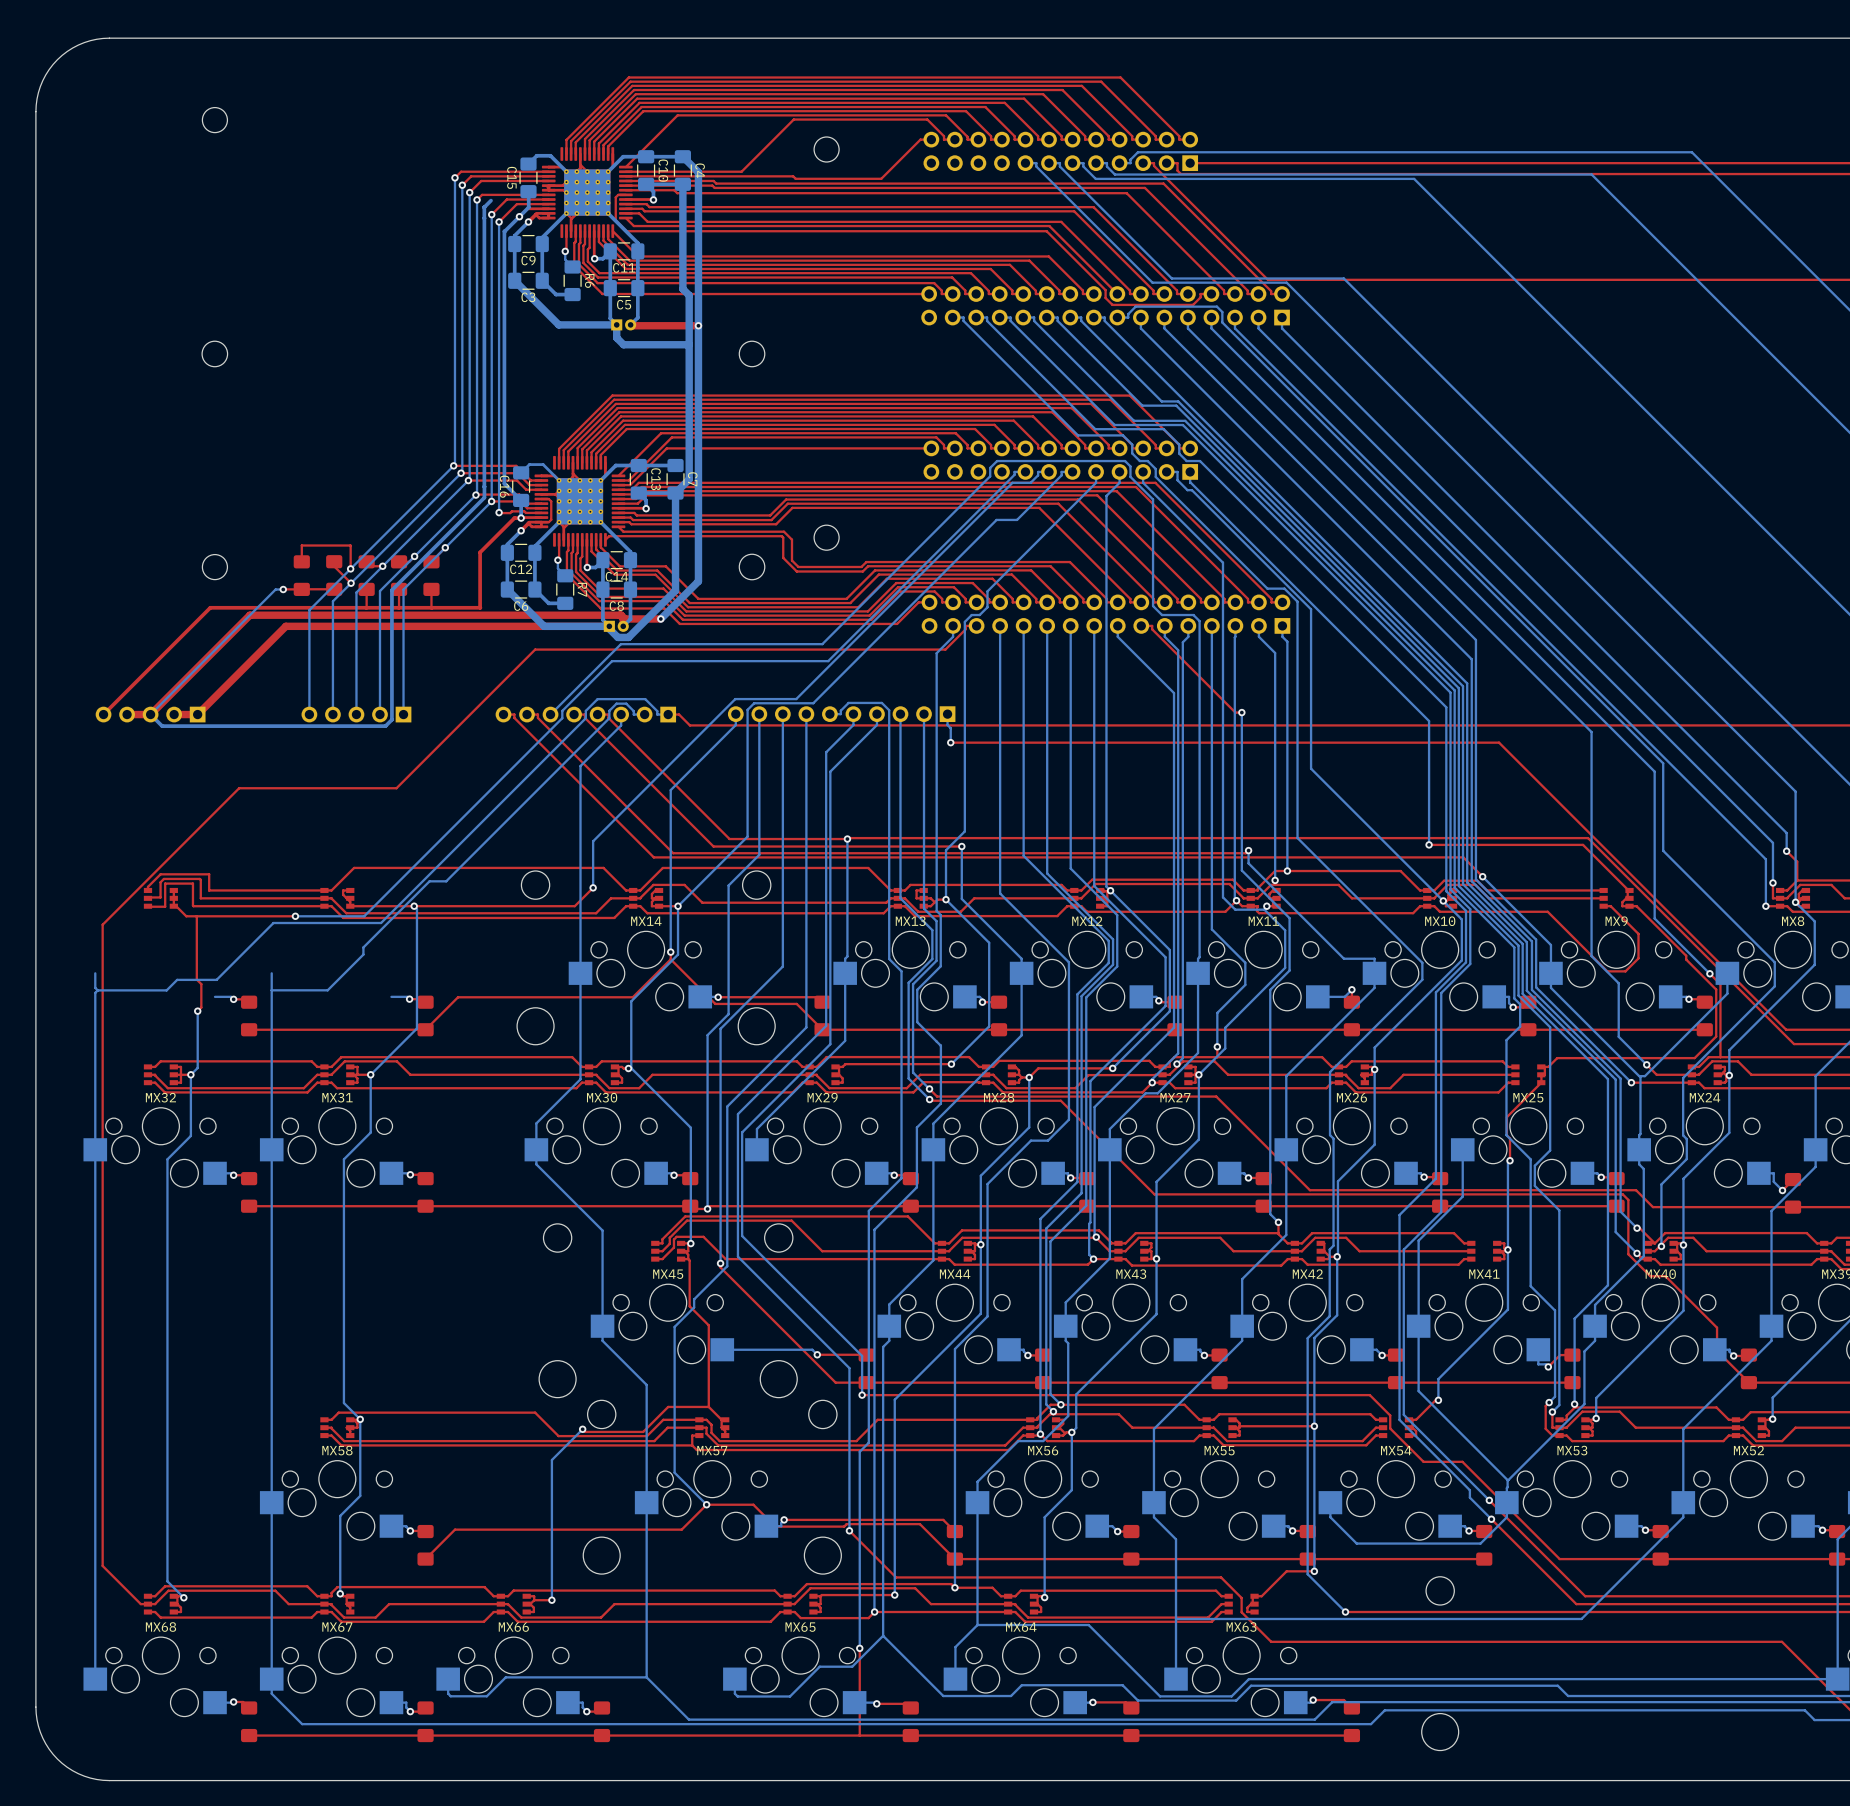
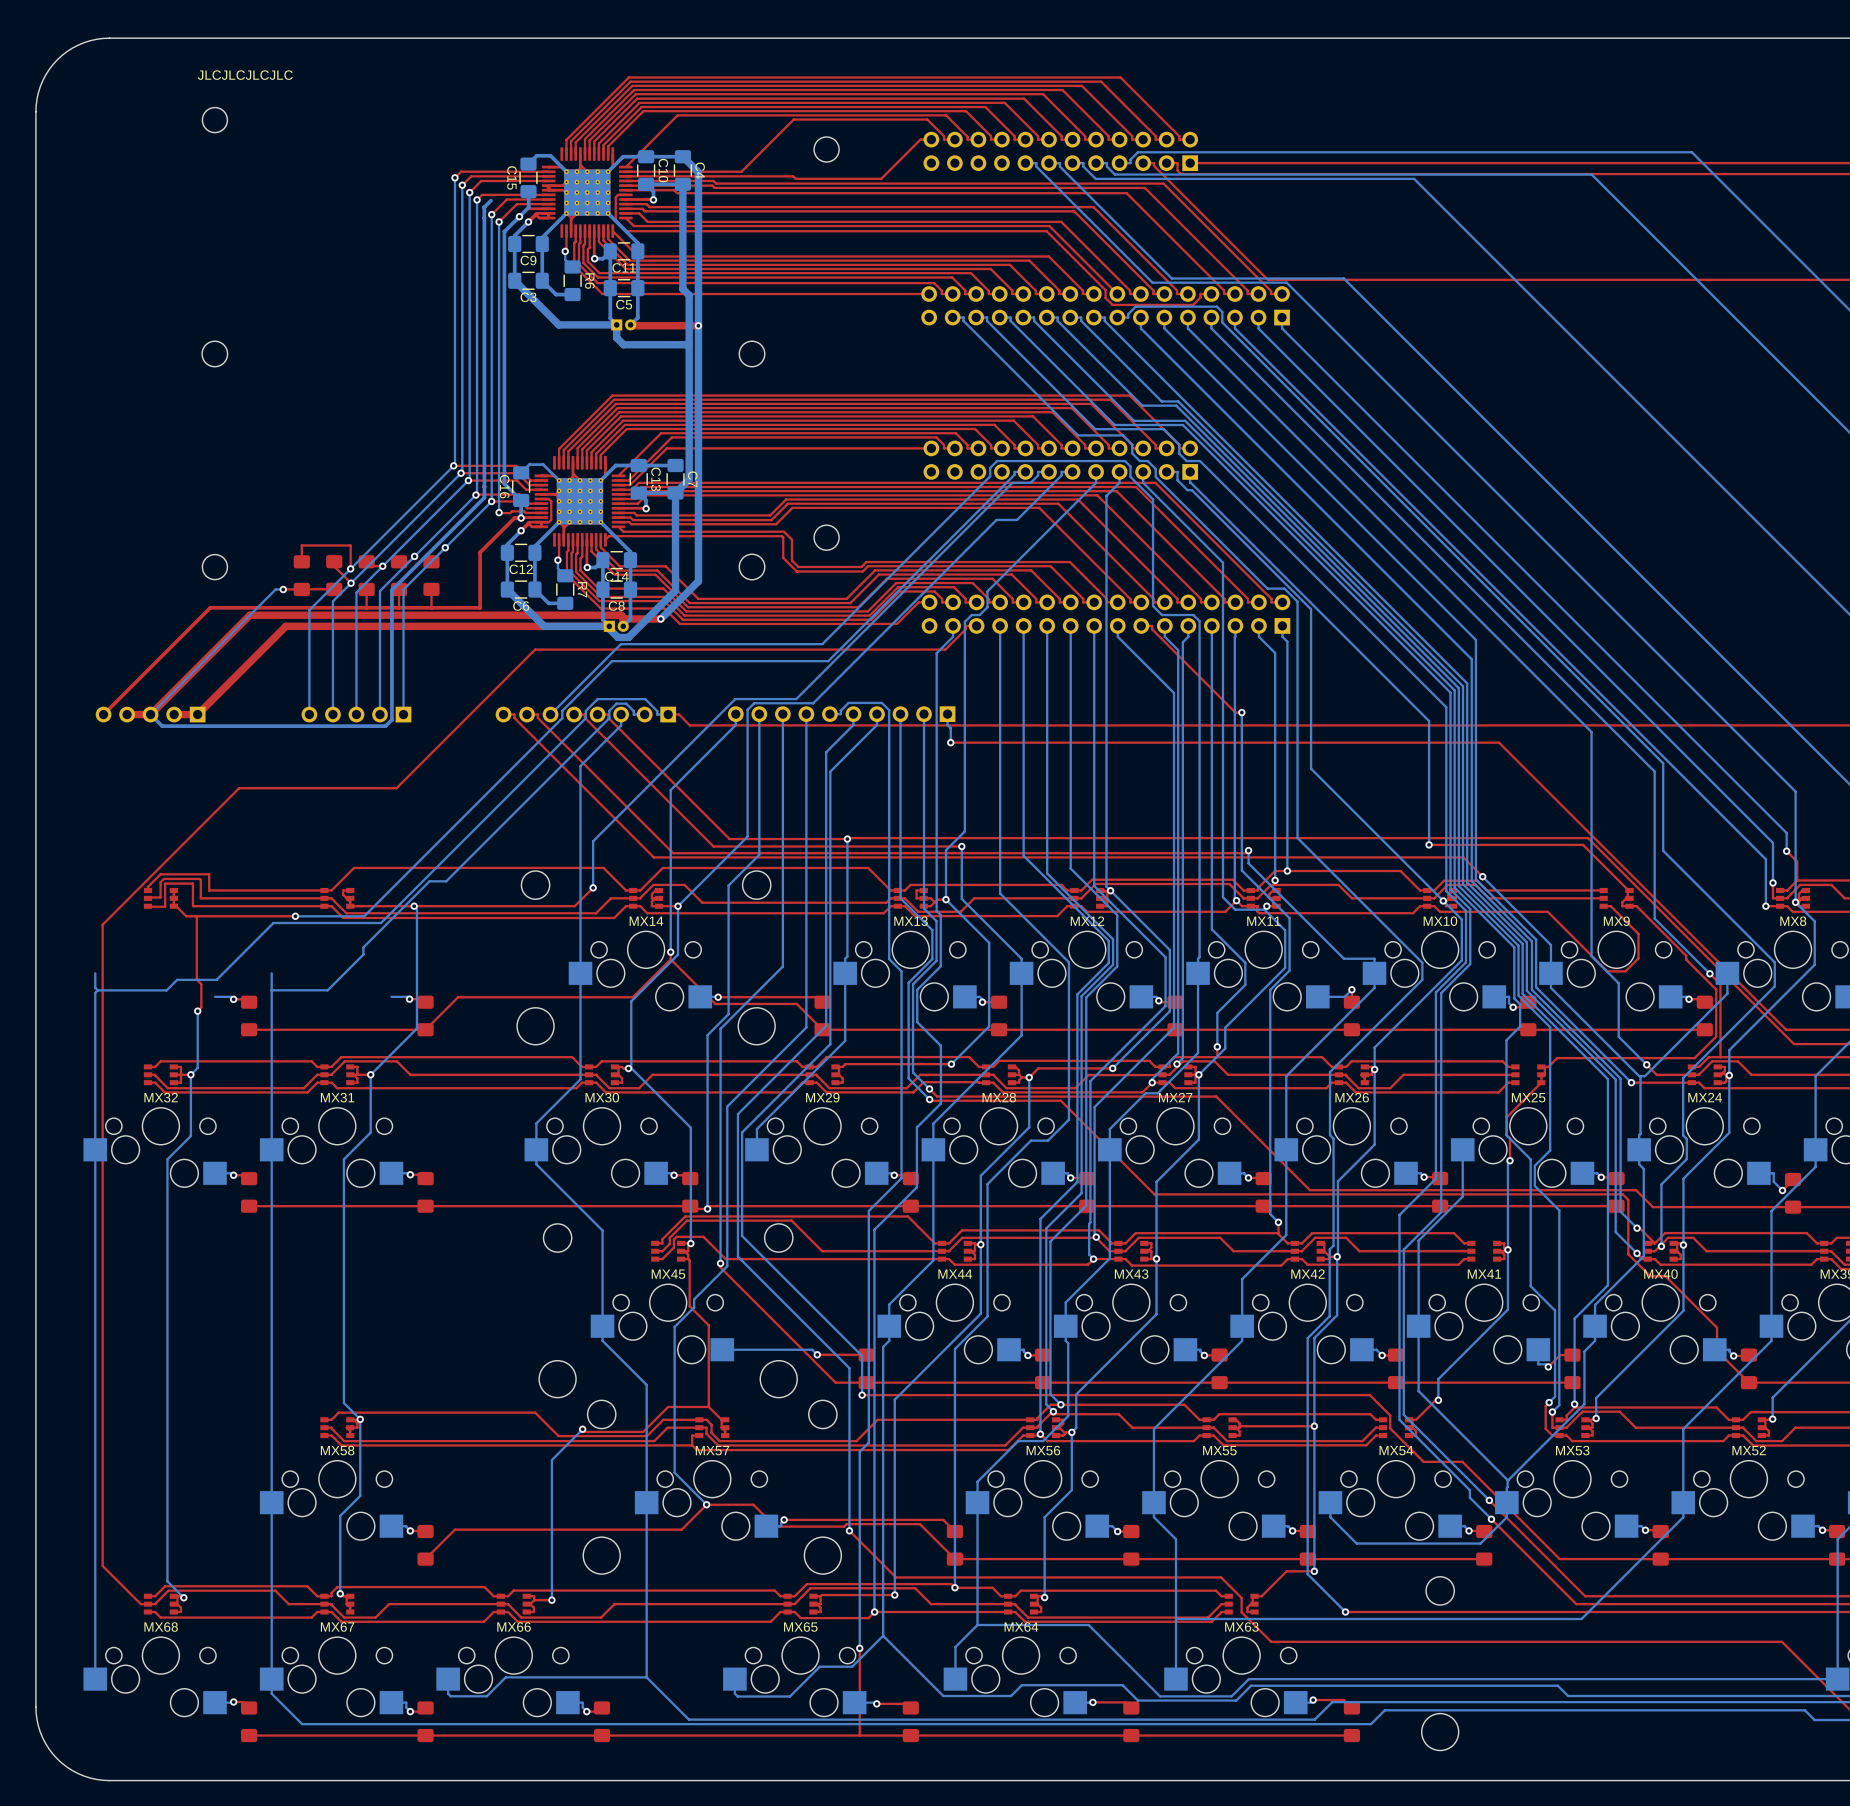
text: none -> JLCJLCJLCJLC (245, 75)

